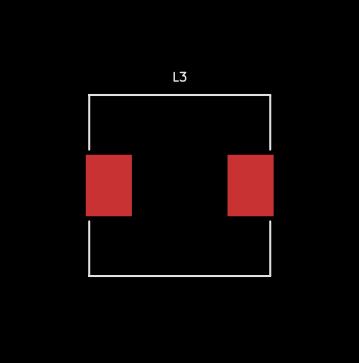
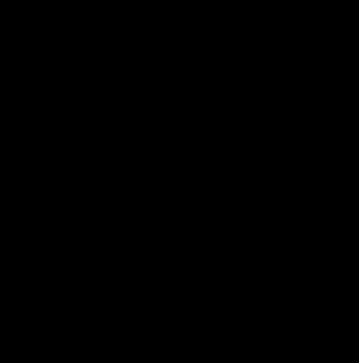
L3: (179, 185) -> none

